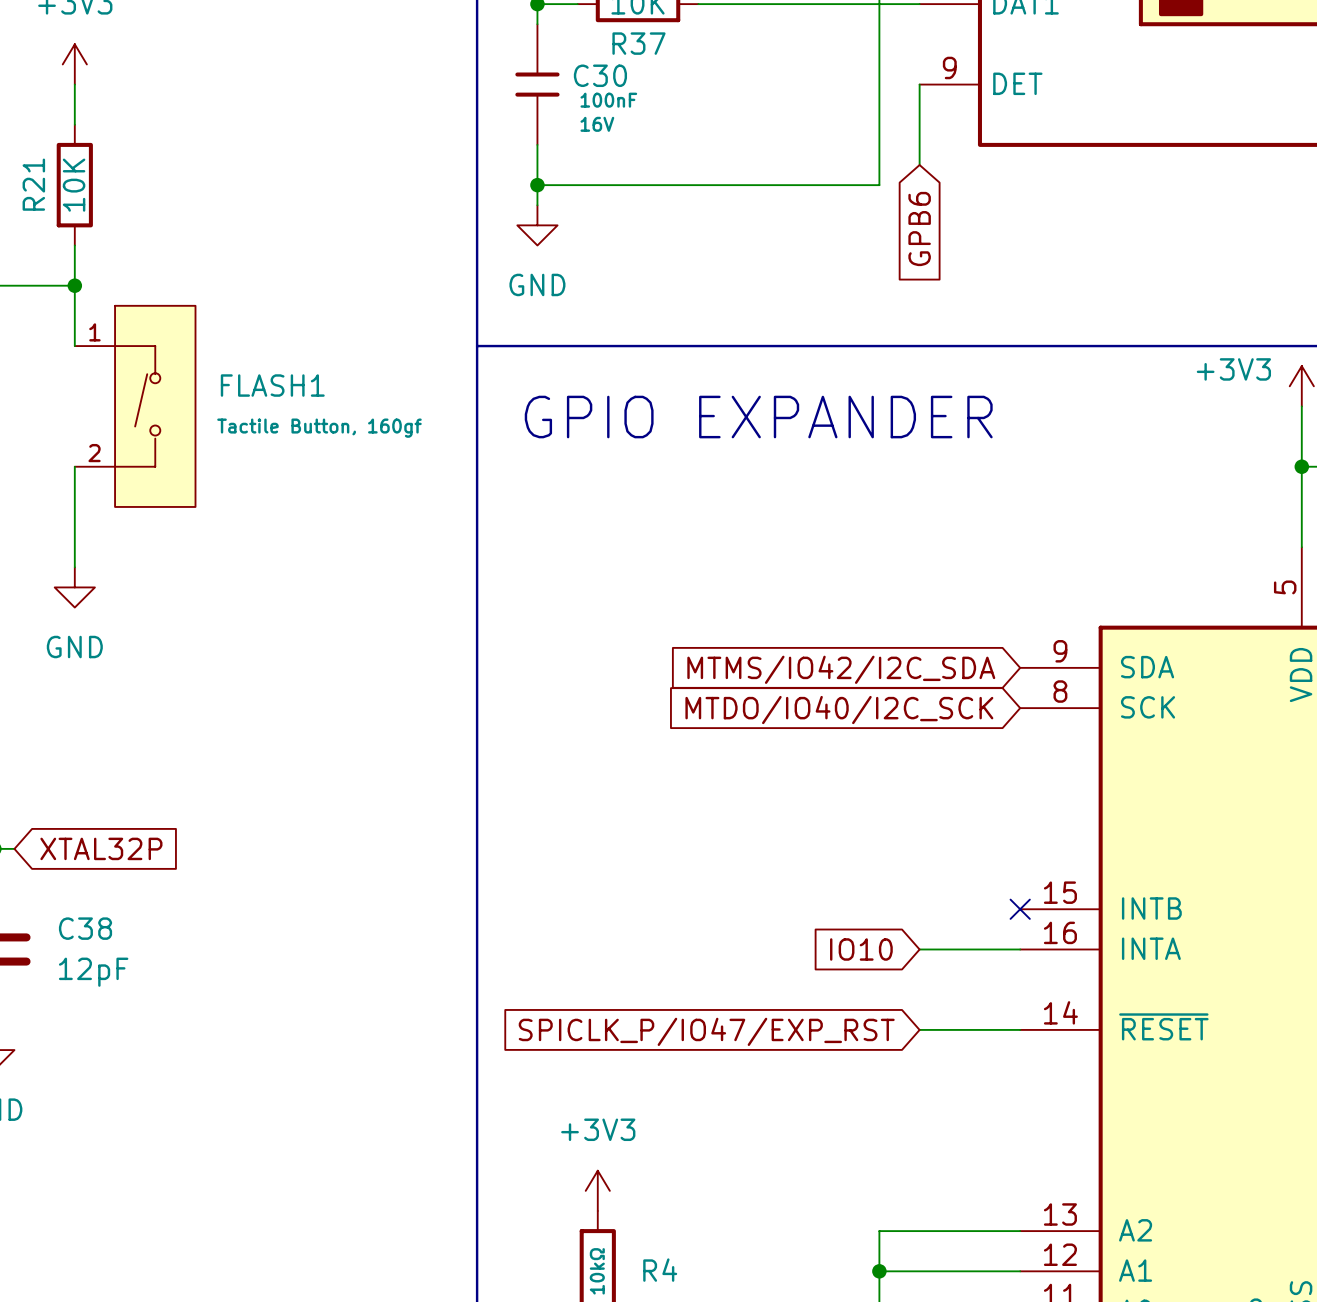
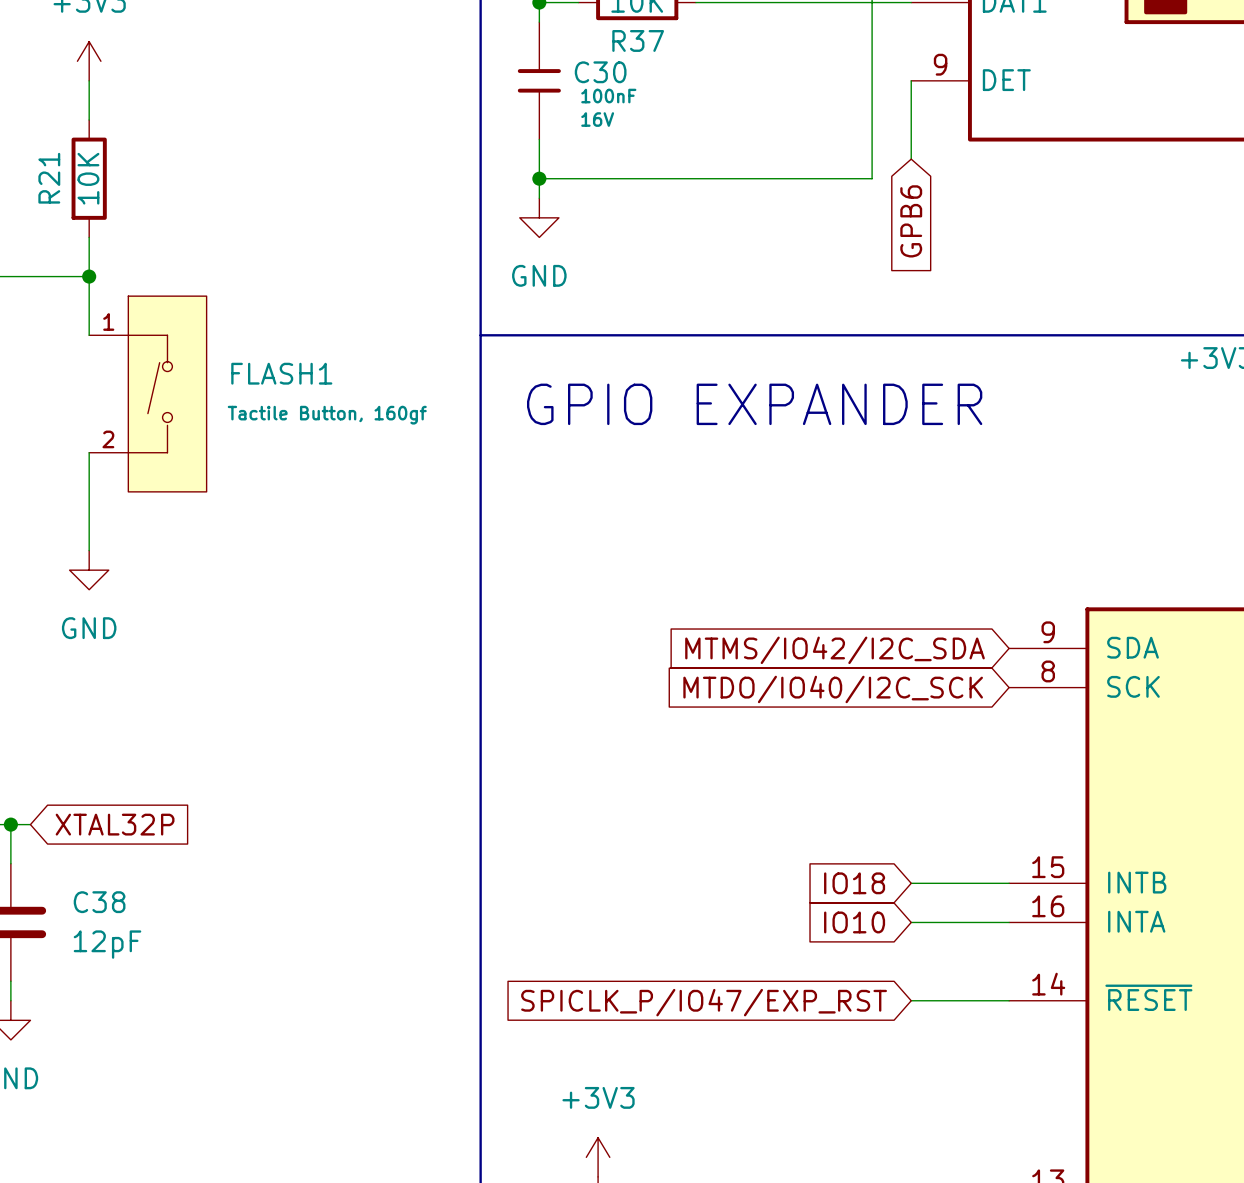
global label: none -> IO18 (854, 883)
wire: none -> (911, 883) (1009, 883)
no-connect mark: (1020, 909) -> none

